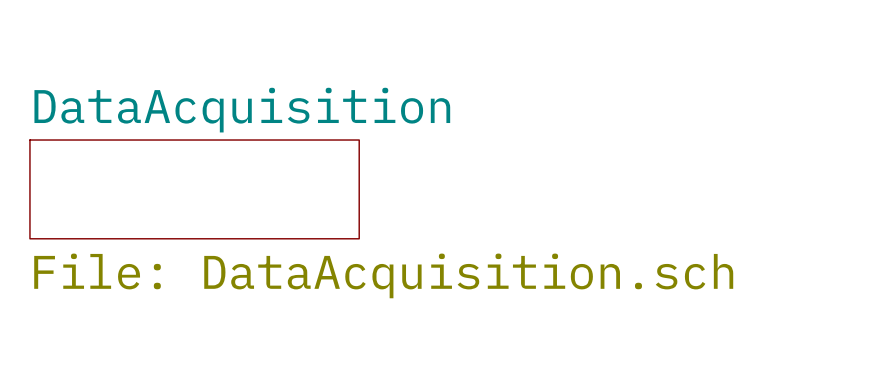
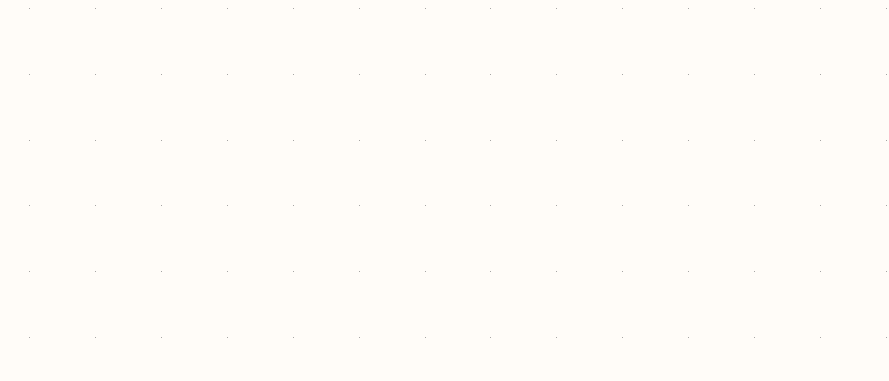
sheet DataAcquisition: File: DataAcquisition.sch (194, 189) -> none

